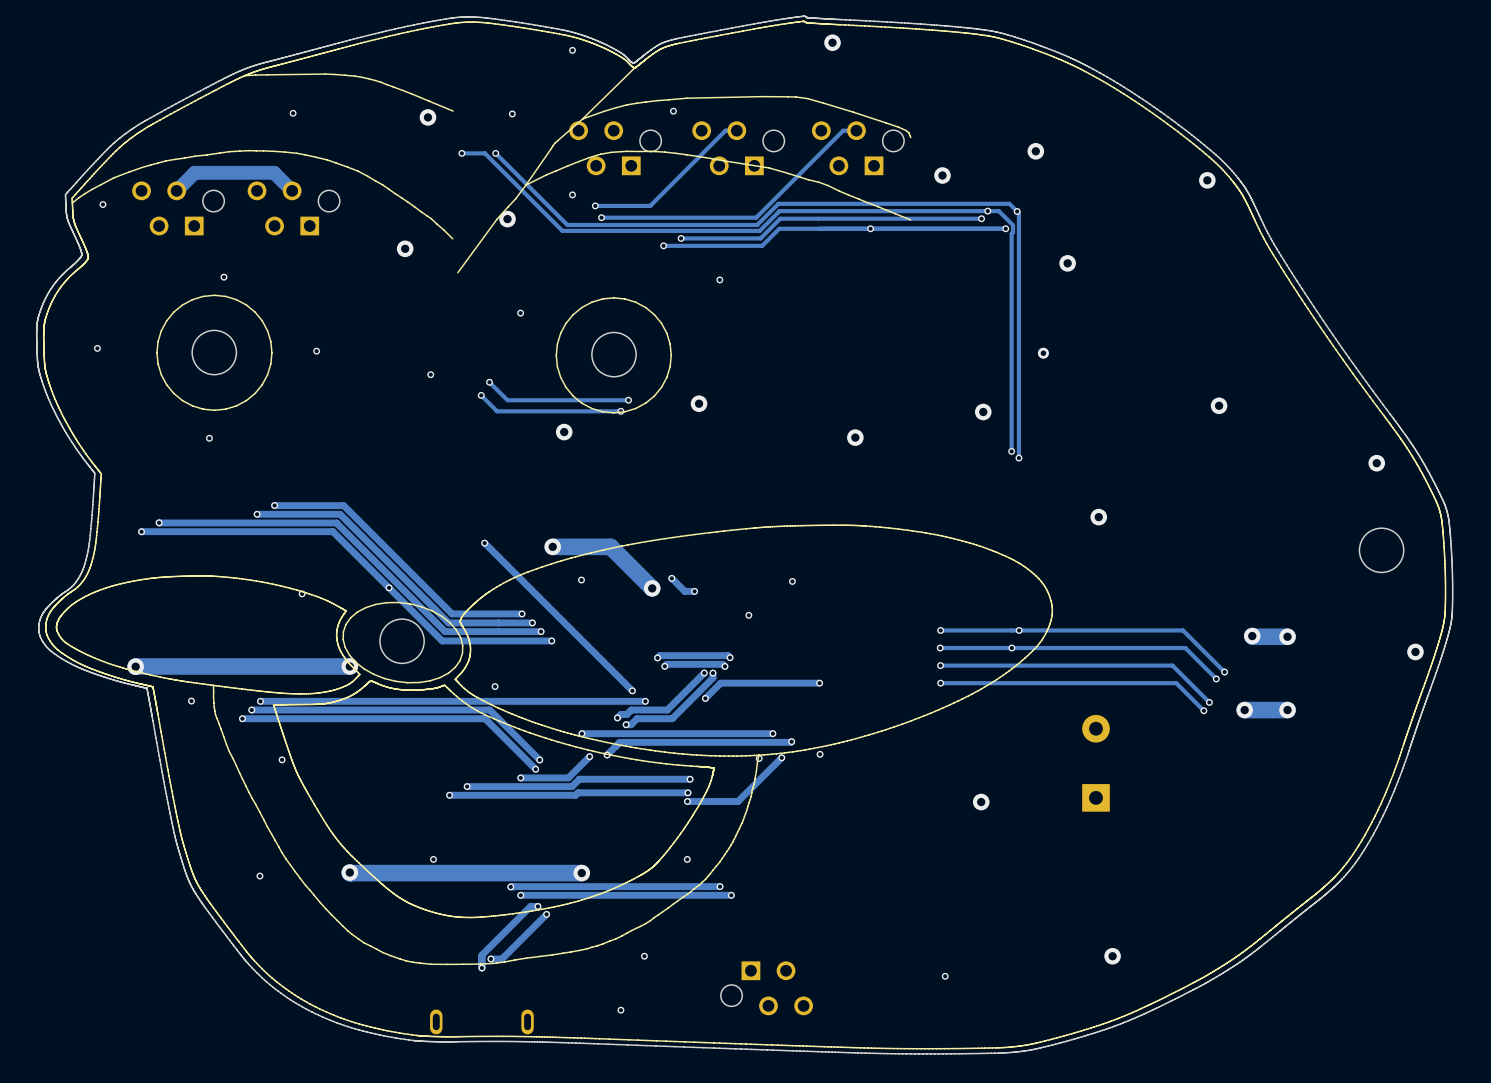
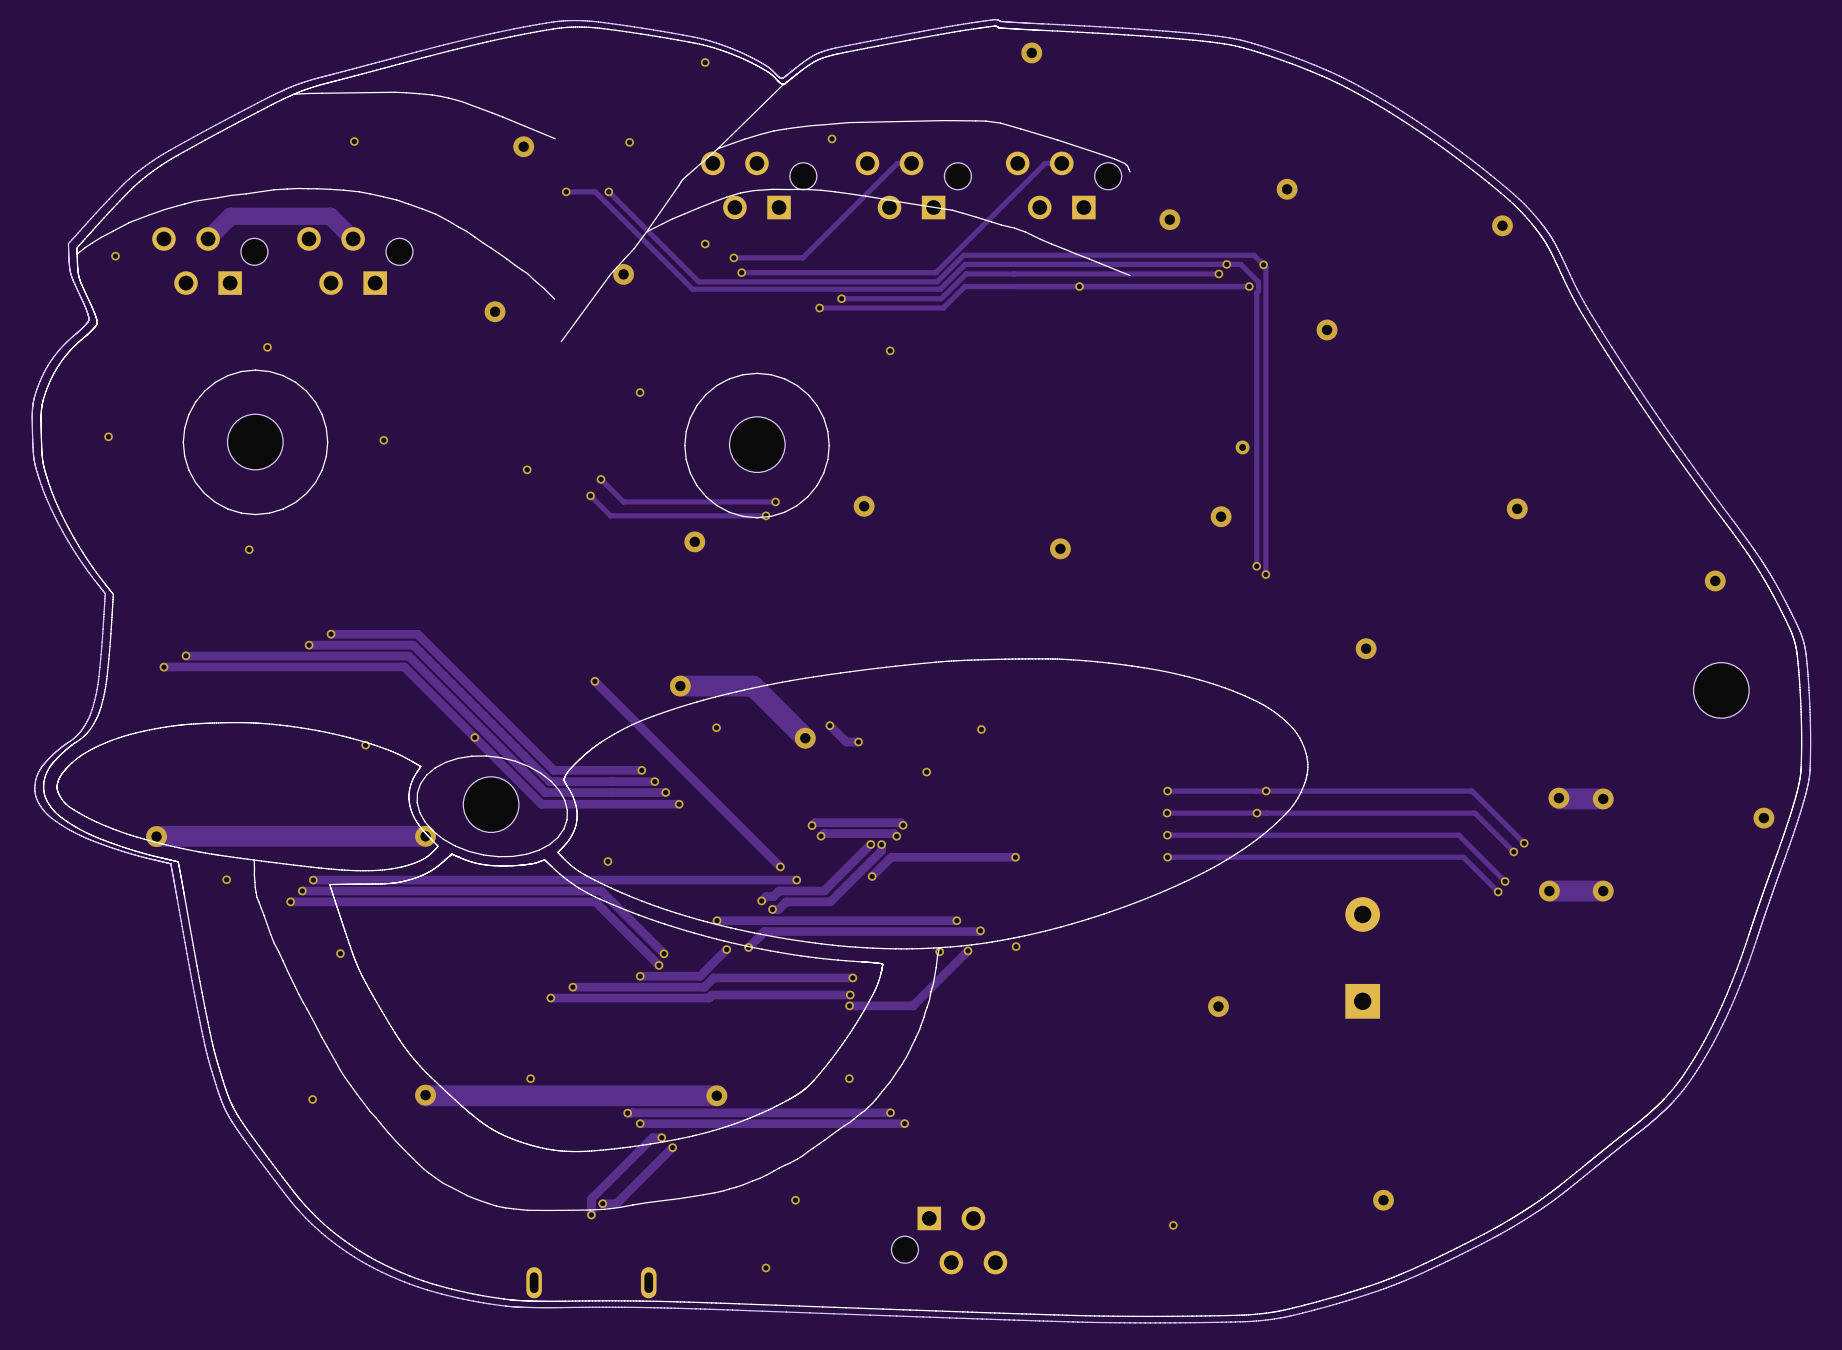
via position: (1043, 353) -> (1242, 447)

